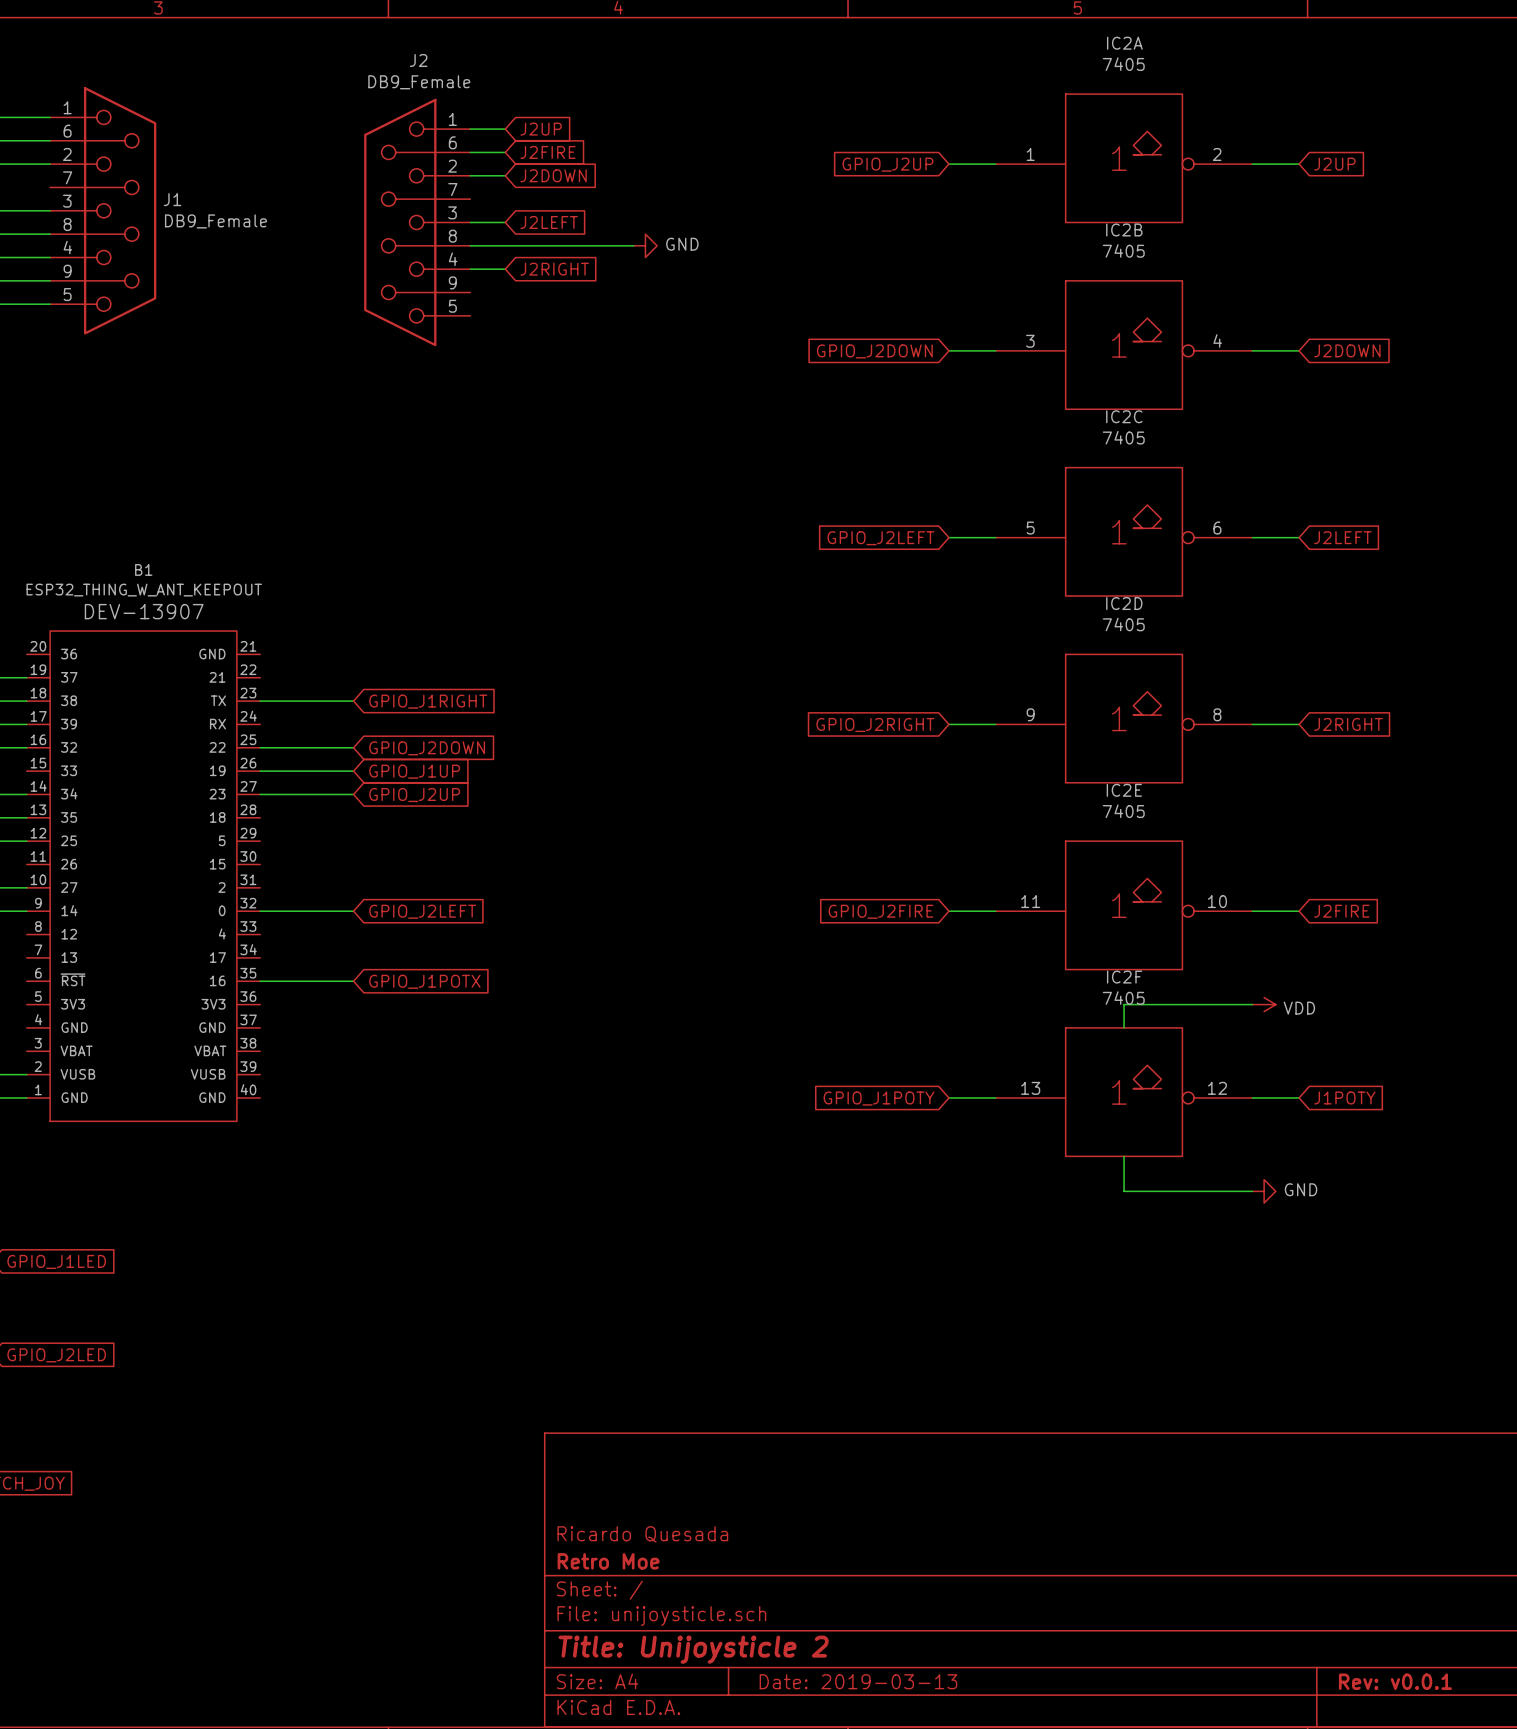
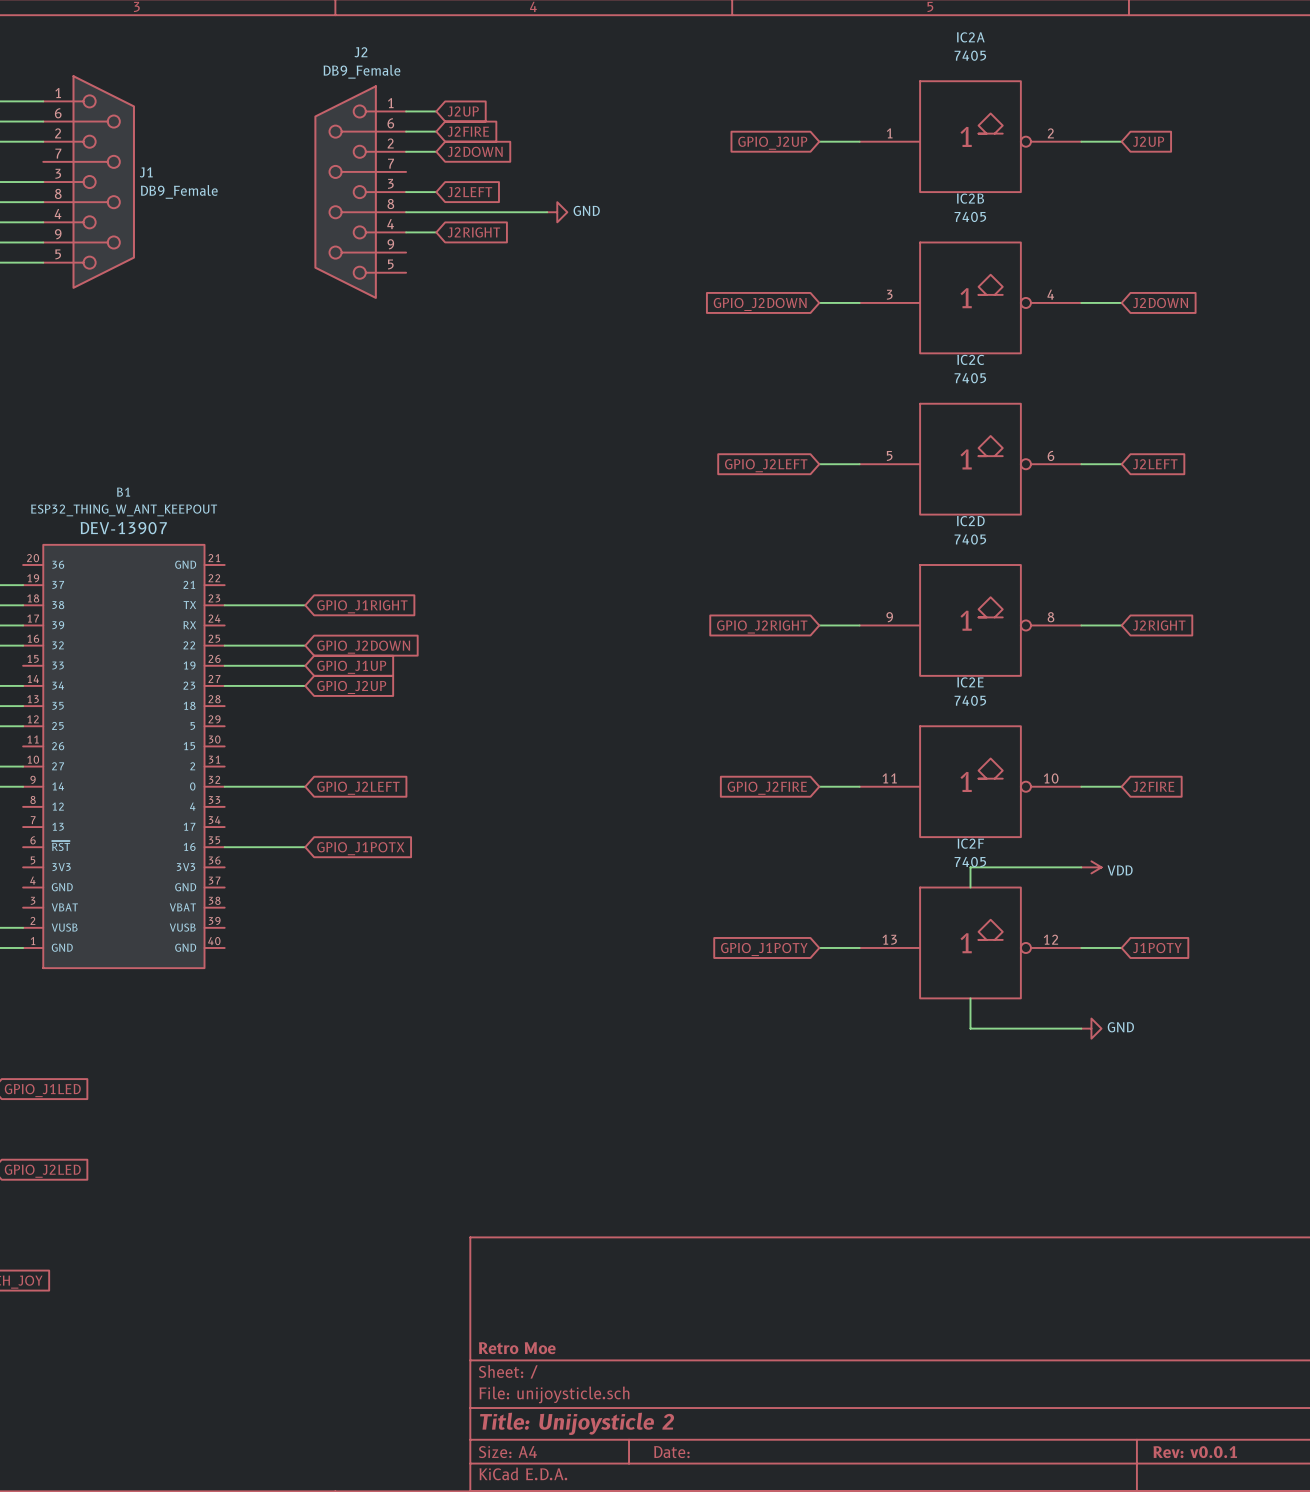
title block: Ricardo Quesada (642, 1534) -> none
title block: Date: 2019-03-13 (858, 1681) -> Date: (671, 1452)

